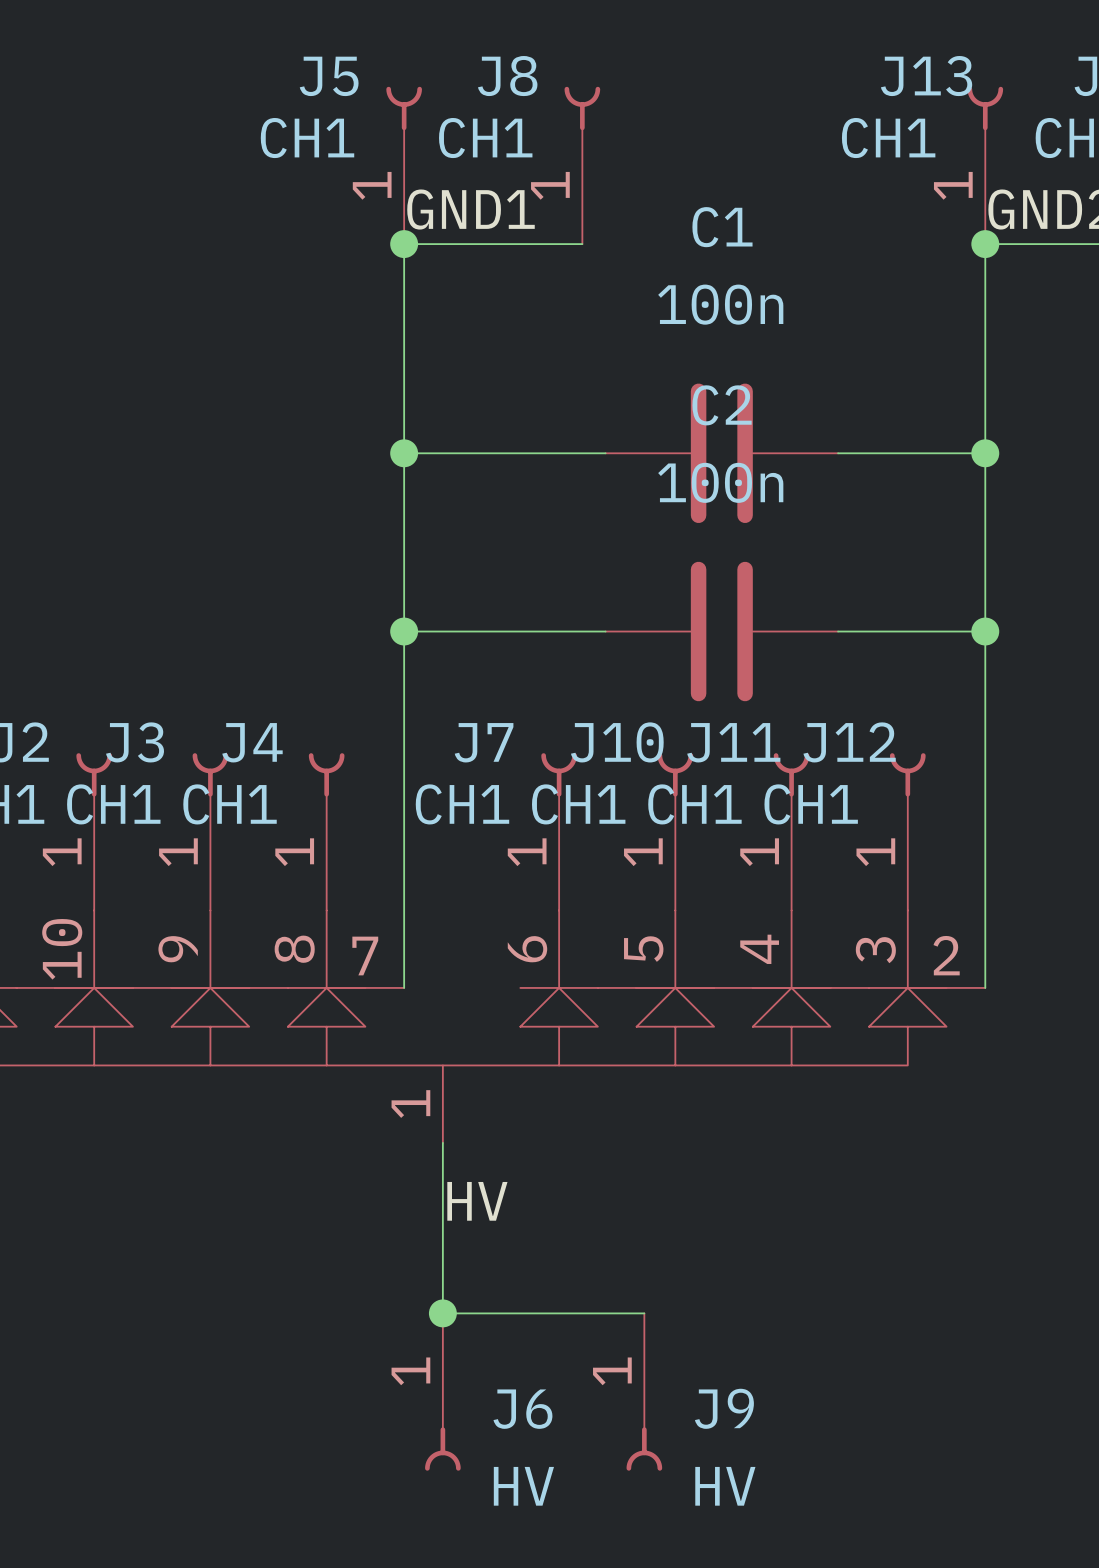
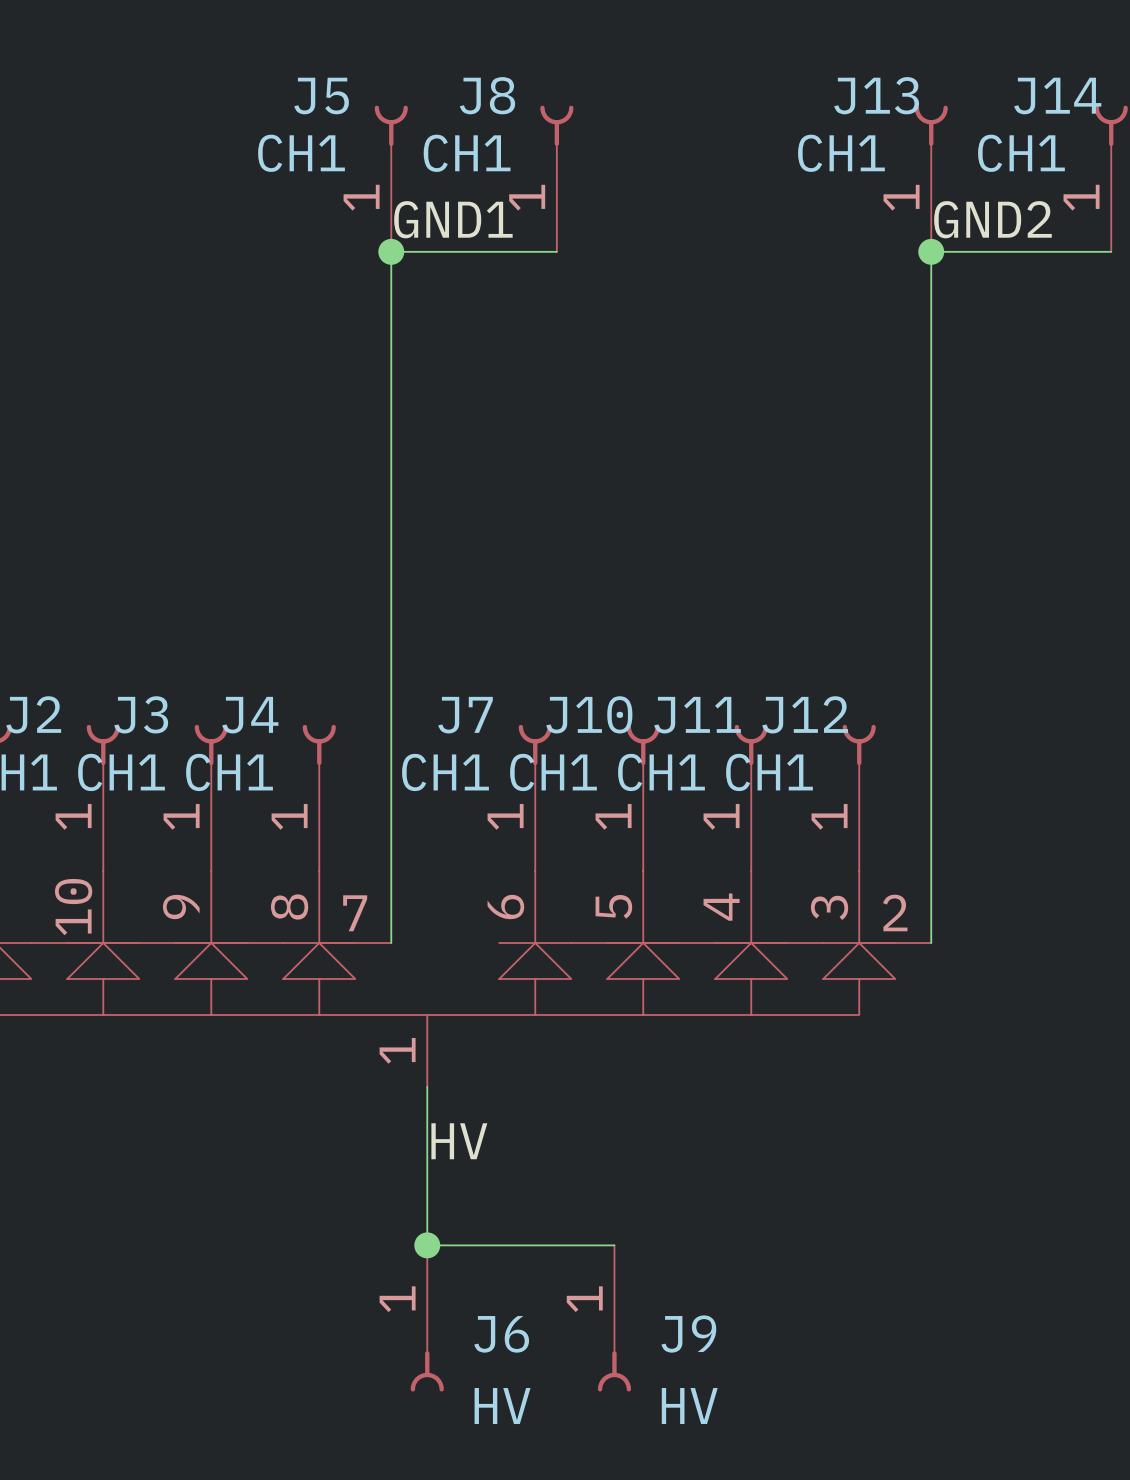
wire: (404, 453) (605, 453) -> none
junction: (404, 453) -> none
C1: 100n (721, 453) -> none
wire: (838, 453) (985, 453) -> none
junction: (985, 453) -> none
wire: (404, 631) (605, 631) -> none
junction: (404, 631) -> none
C2: 100n (721, 631) -> none
wire: (838, 631) (985, 631) -> none
junction: (985, 631) -> none

